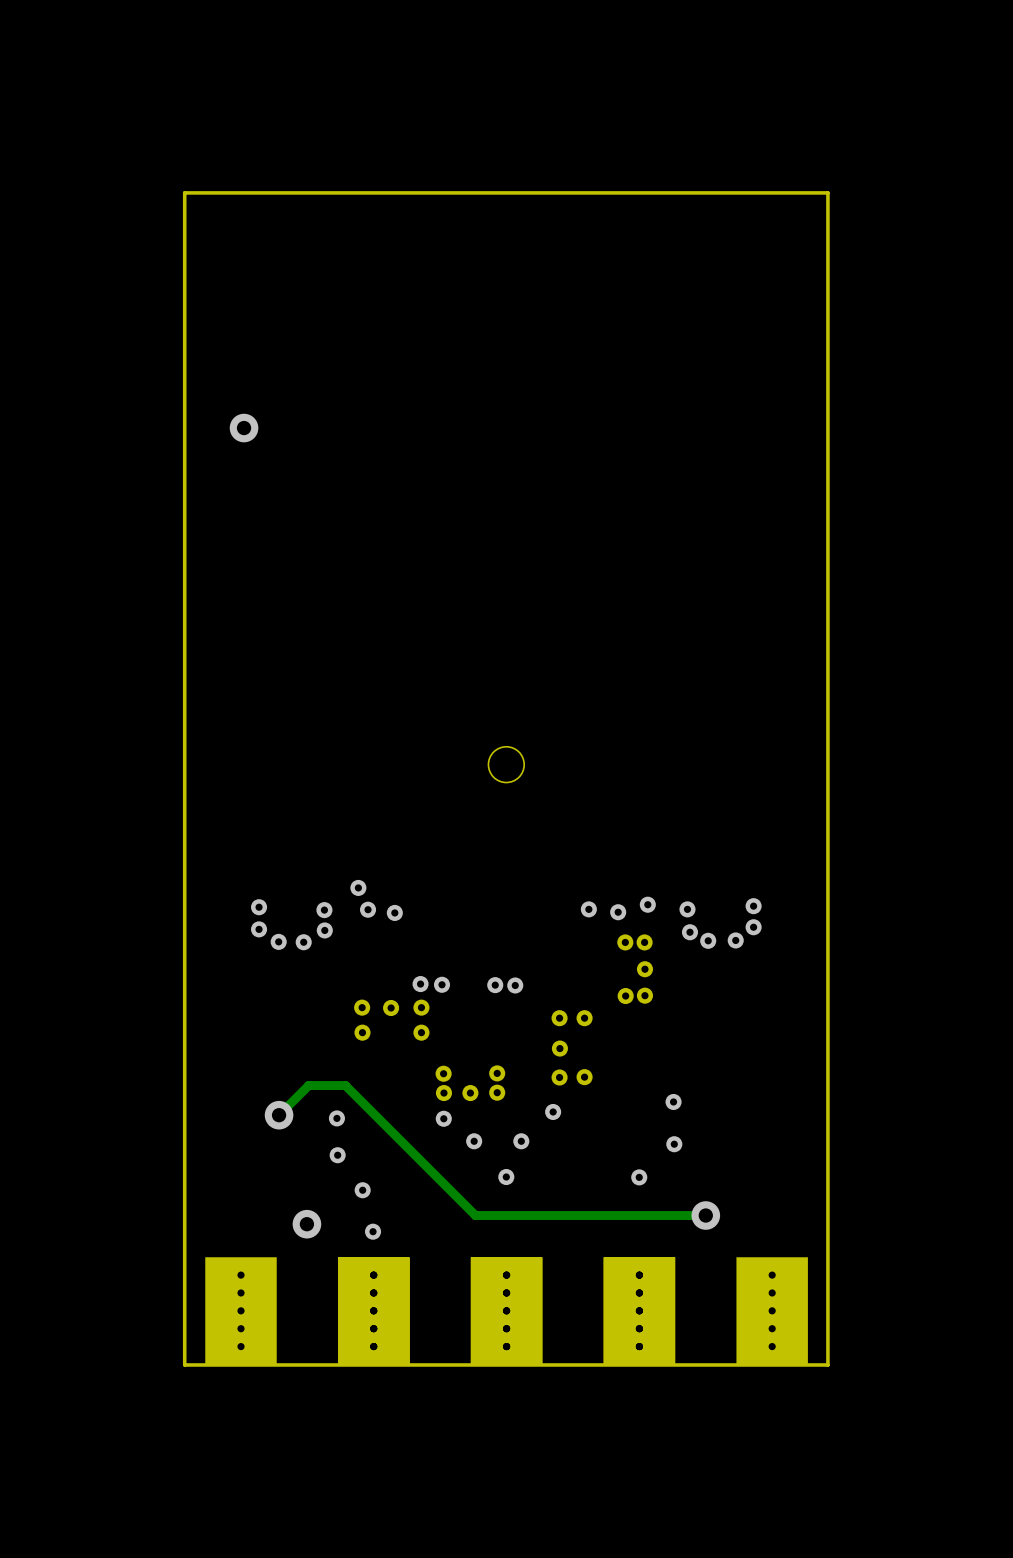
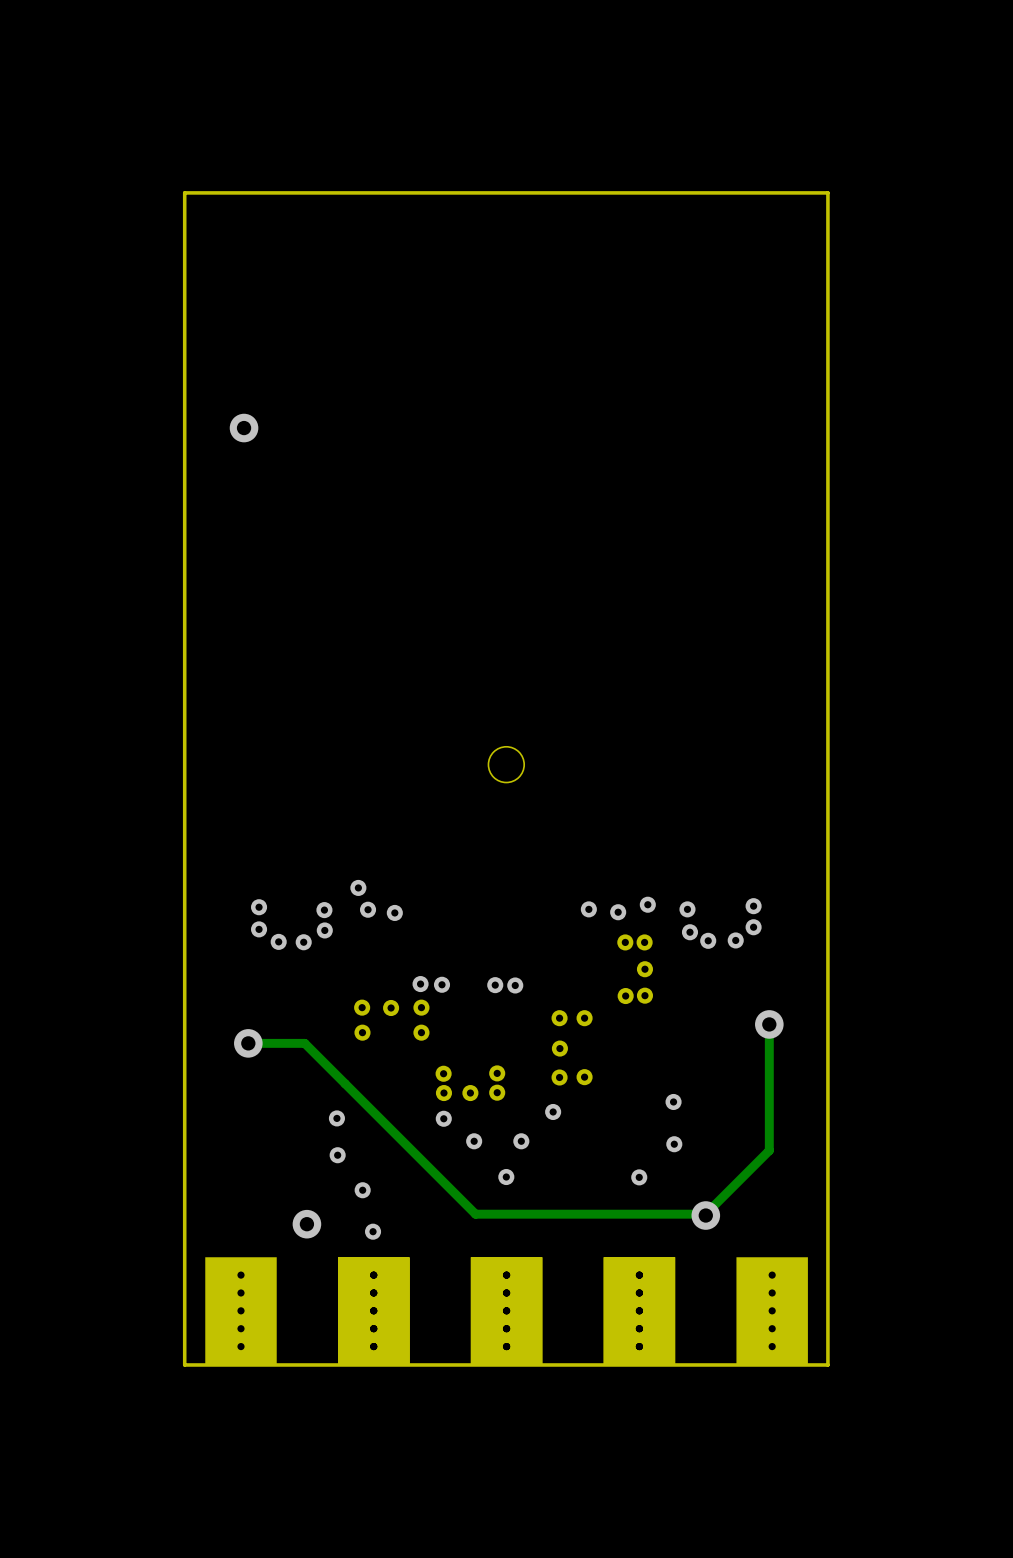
track: none -> (769, 1024) (769, 1150) (705, 1214) (475, 1214) (304, 1043) (248, 1043)
via: none -> (769, 1024)
track: (279, 1115) (308, 1085) (345, 1085) (475, 1215) (705, 1215) -> none
via position: (279, 1115) -> (248, 1043)

